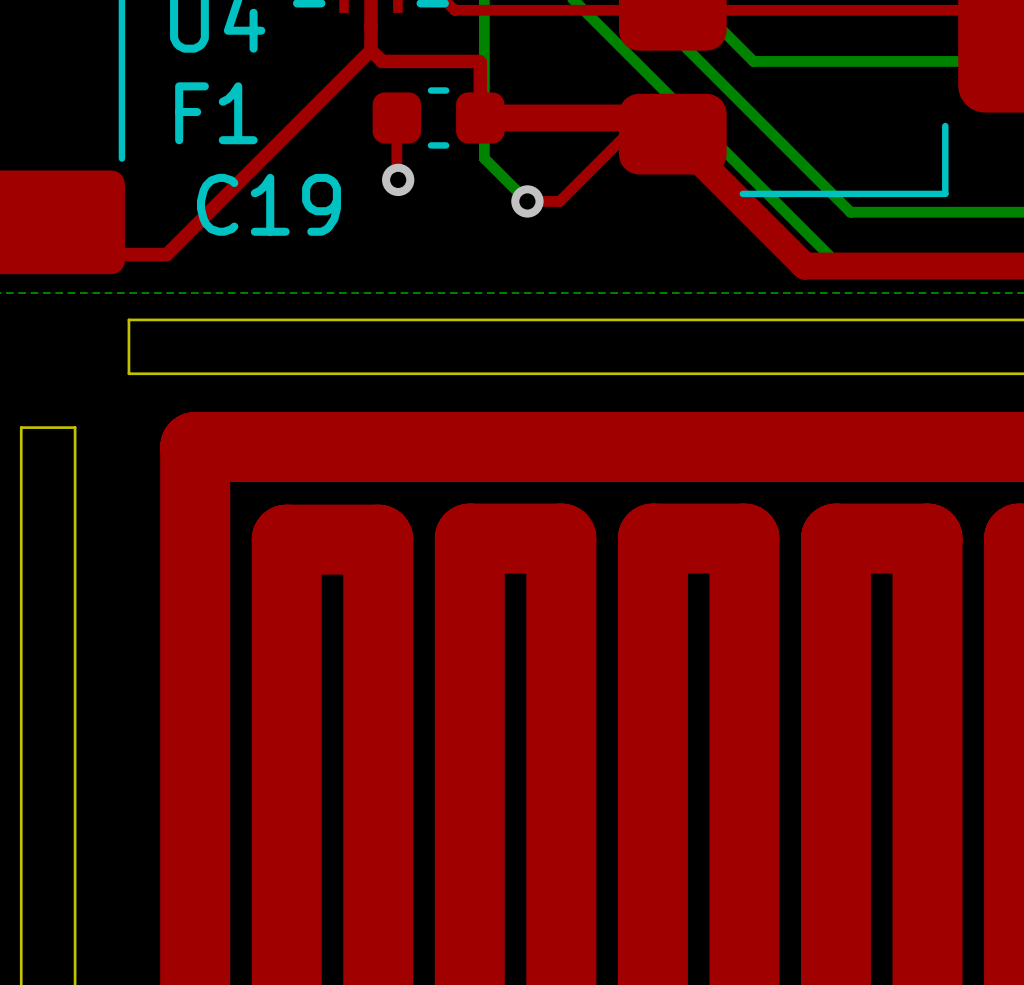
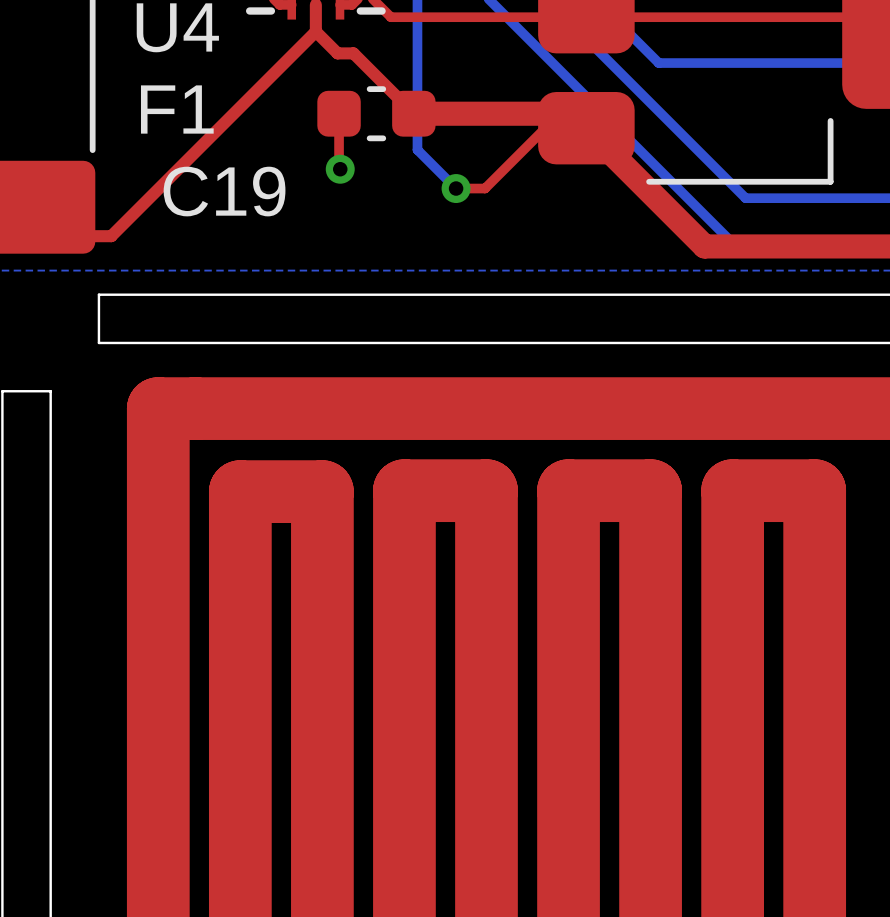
top track: (370, 26) (370, 50) -> none
top track: (370, 50) (166, 254) (142, 254) -> (413, 113) (353, 53) (337, 53) (315, 31) (111, 236)
top track: (370, 50) (382, 61) (478, 61) (480, 117) -> none

